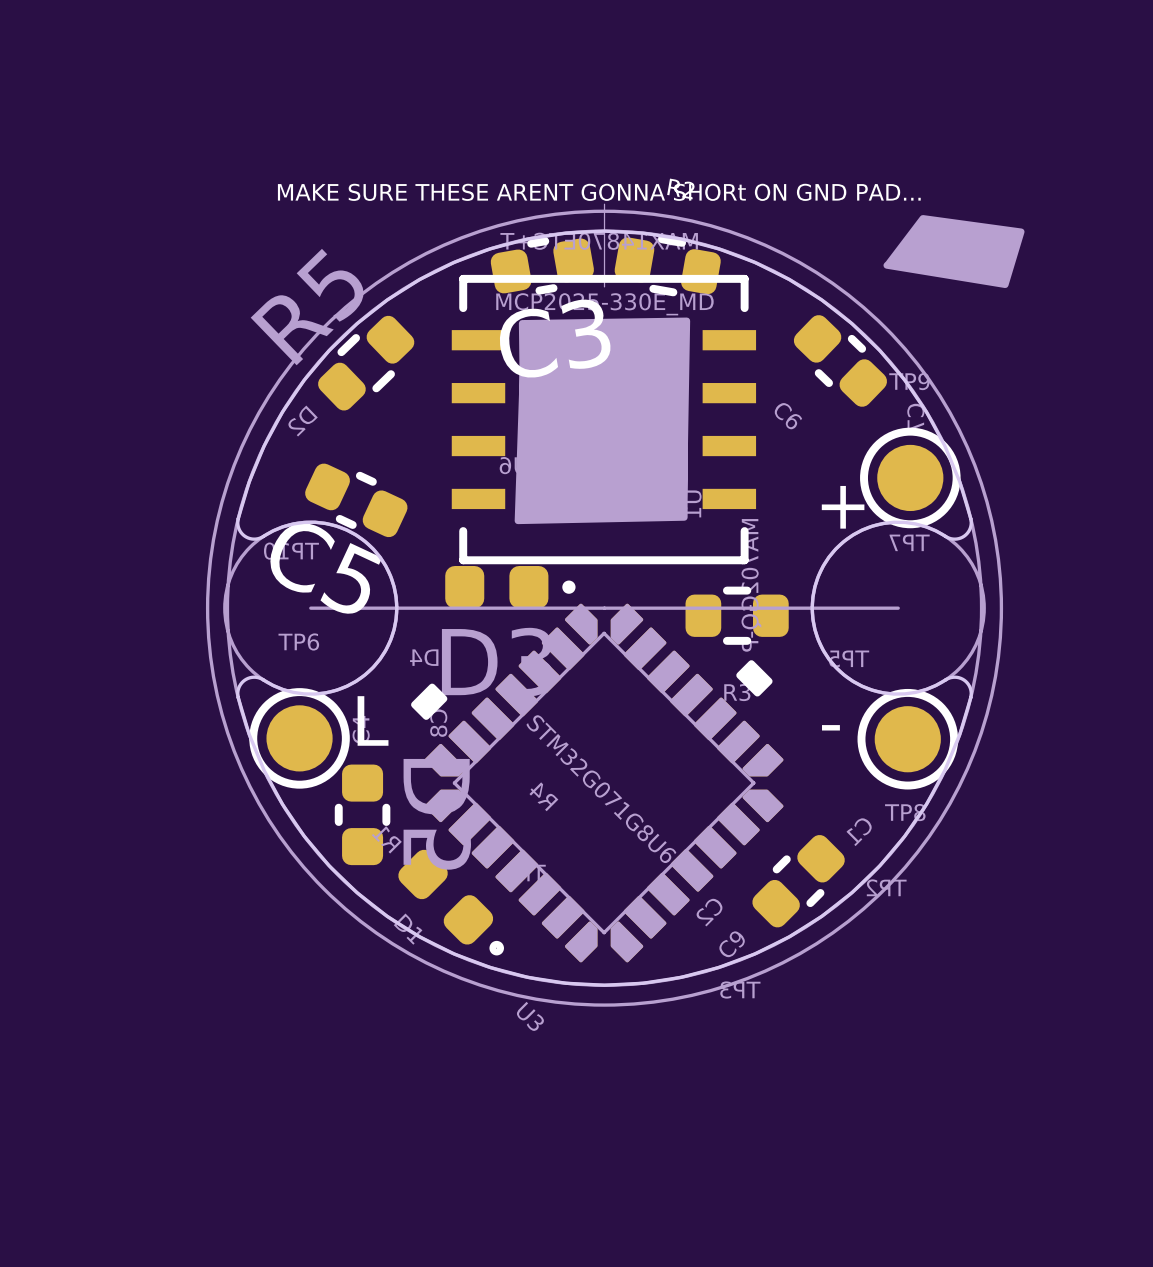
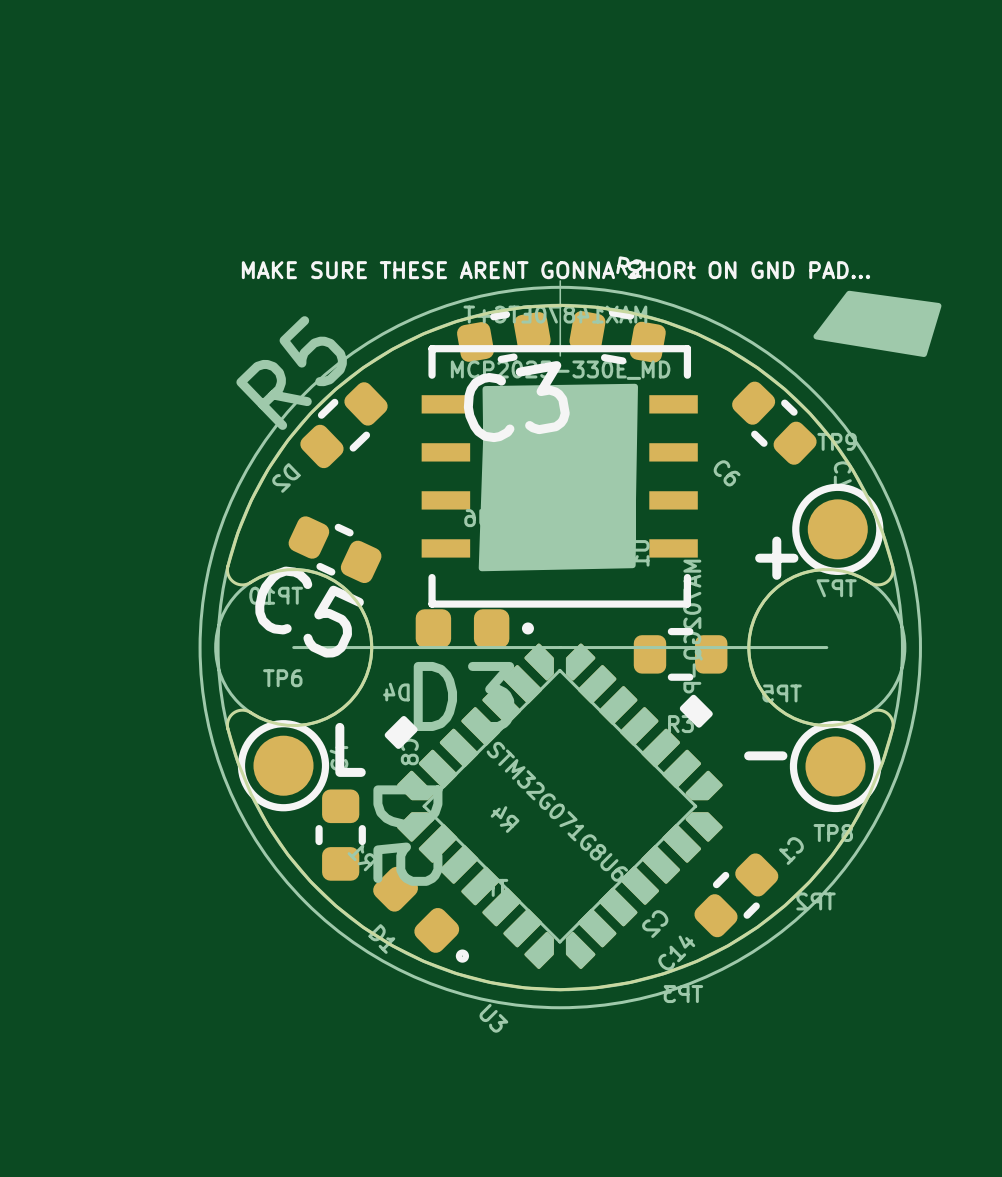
C9 name: C9 (732, 944) -> C14 (676, 952)

